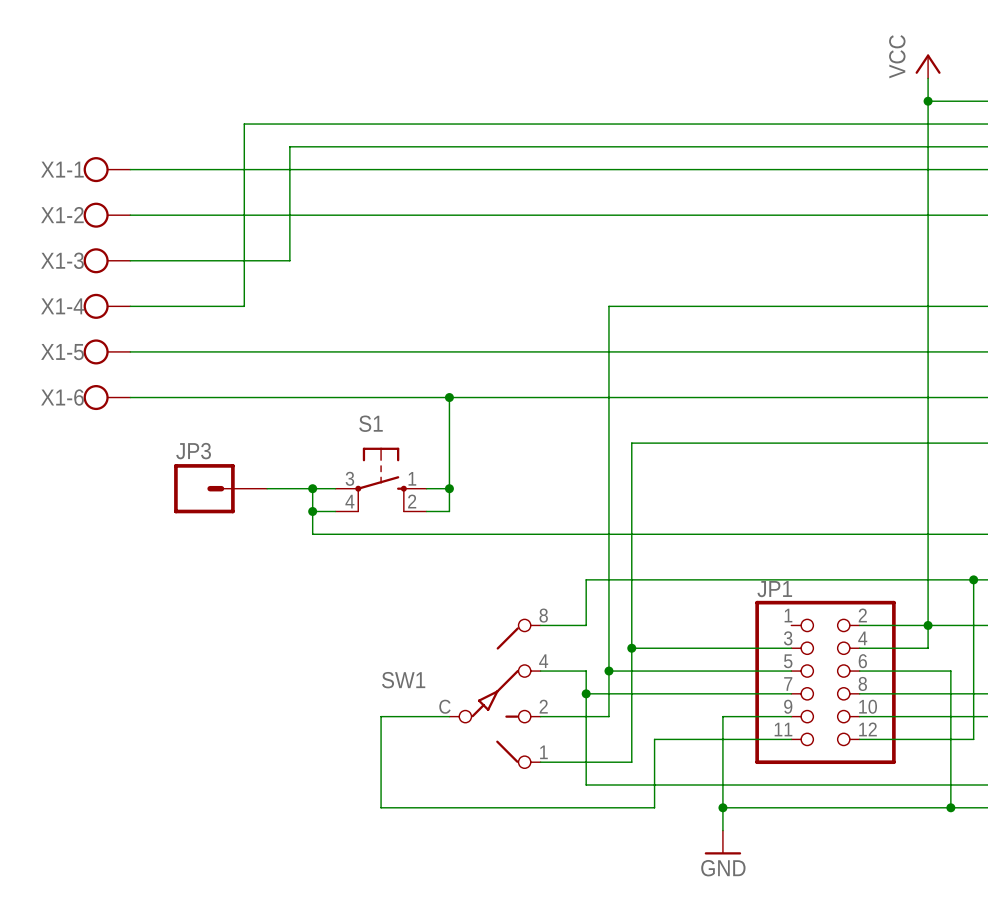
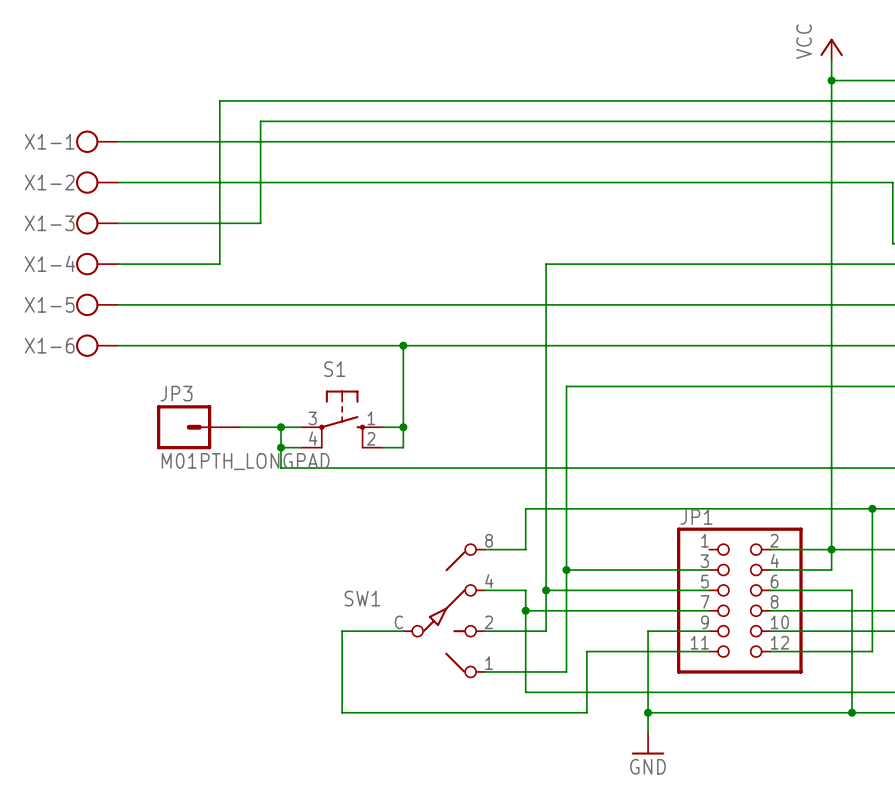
JP3 value: none -> M01PTH_LONGPAD (245, 461)

